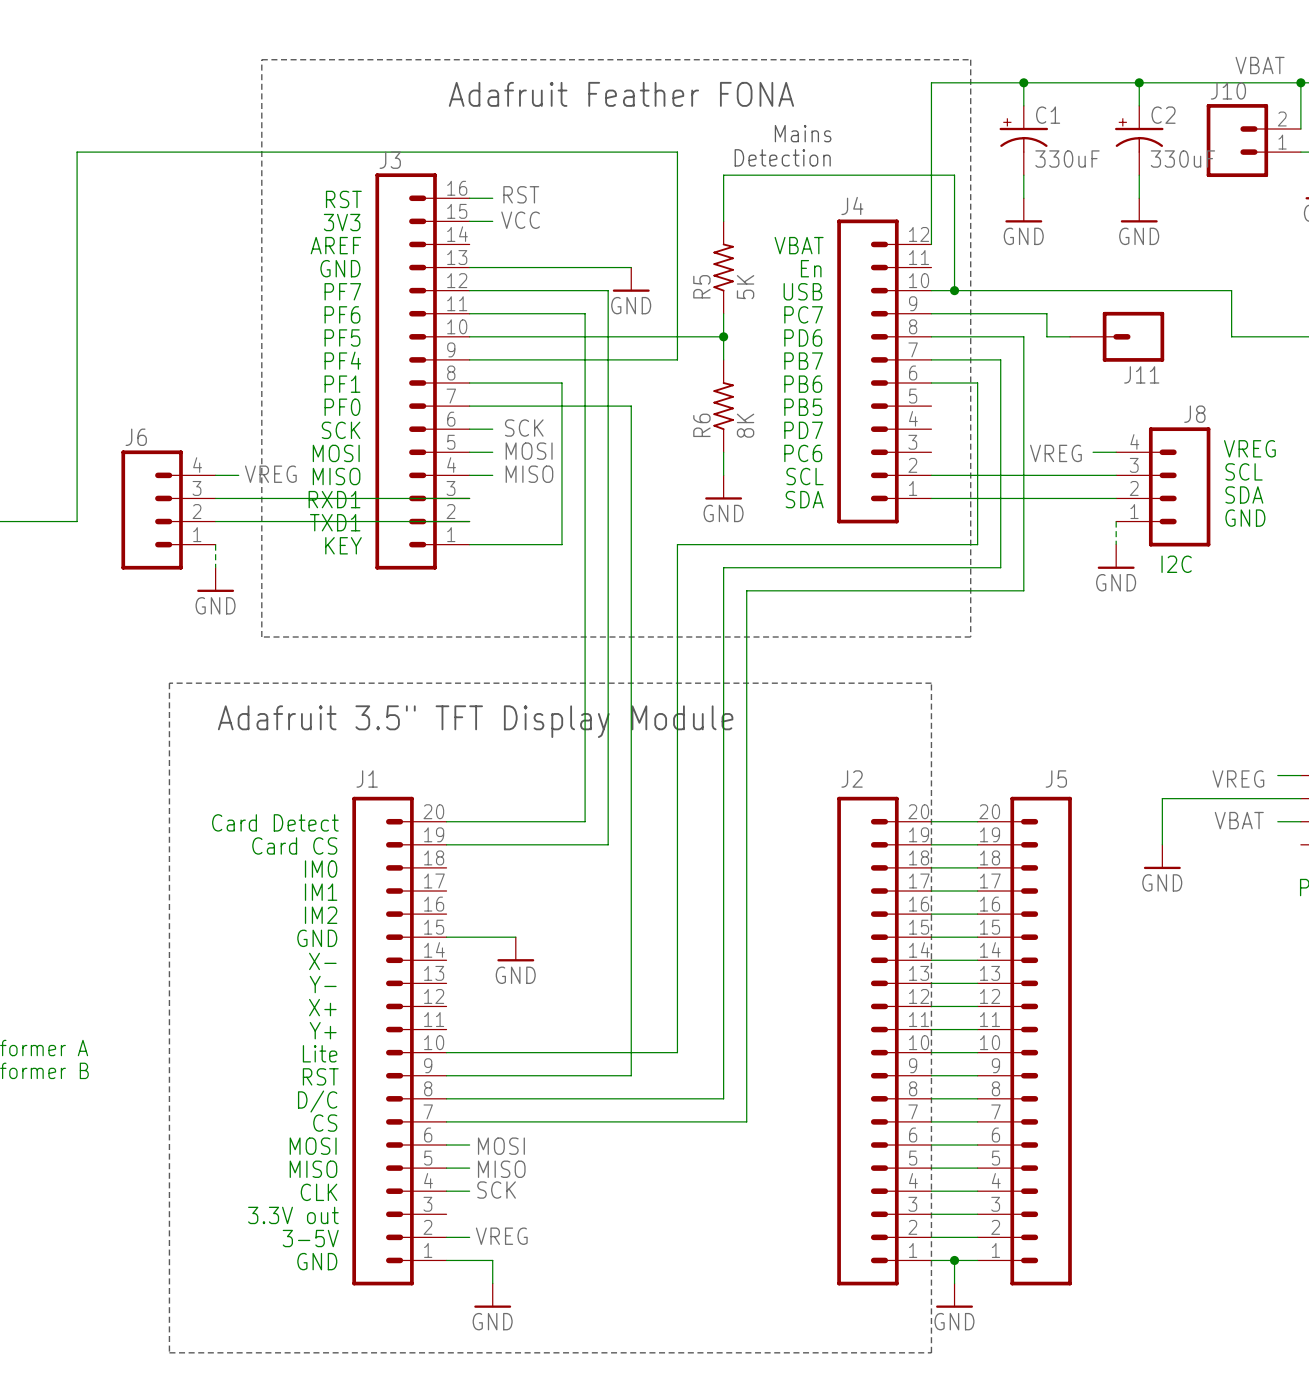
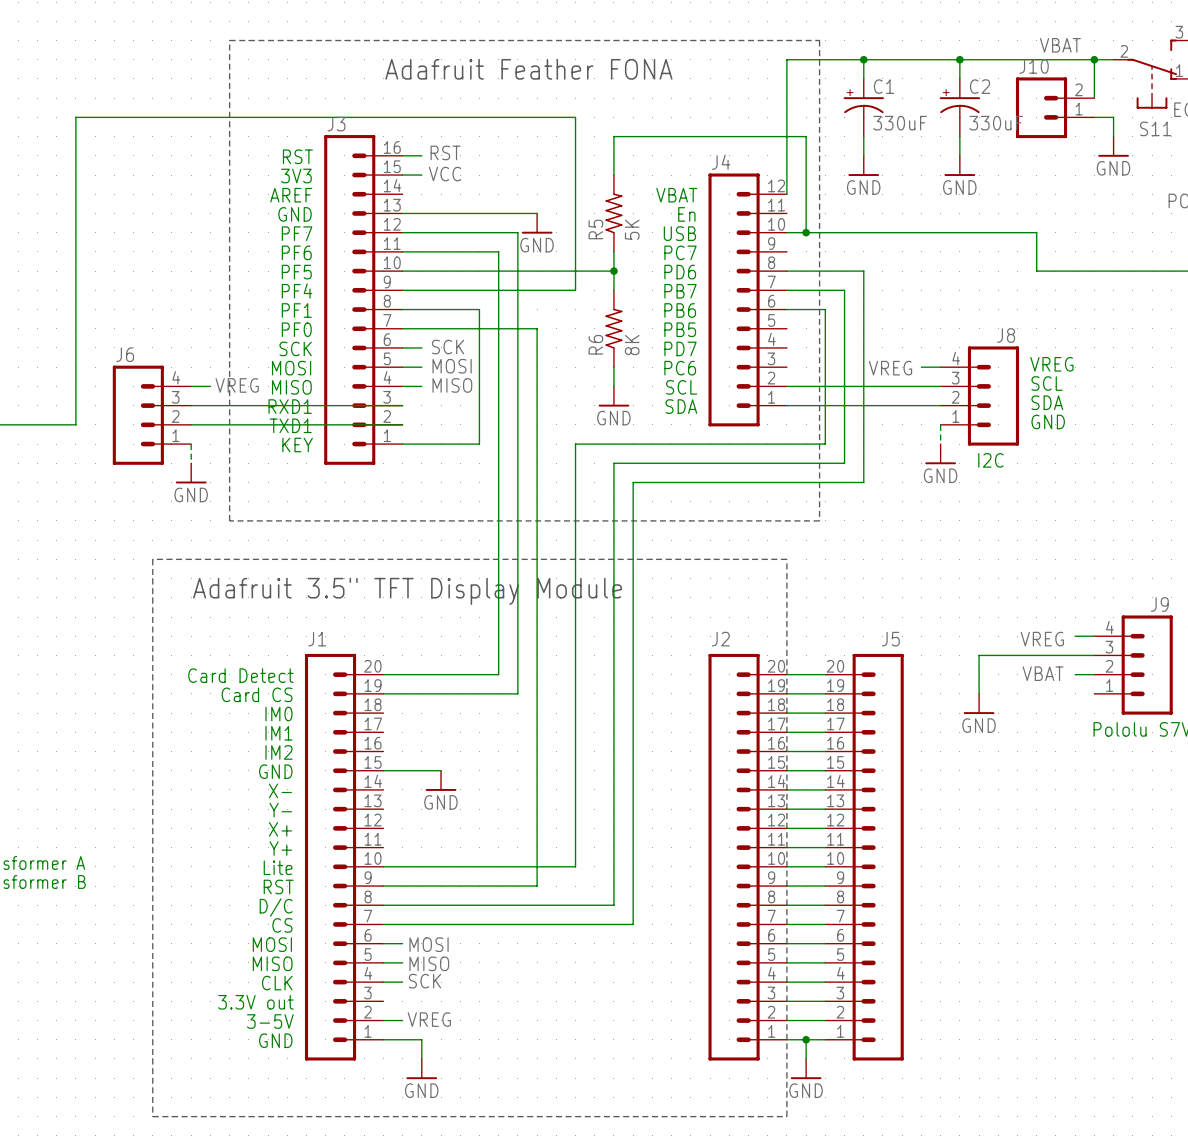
text: Mains (803, 133) -> none
text: Detection (782, 157) -> none
wire: (931, 313) (1046, 313) (1046, 336) (1069, 336) -> none
J11: (1117, 336) -> none

